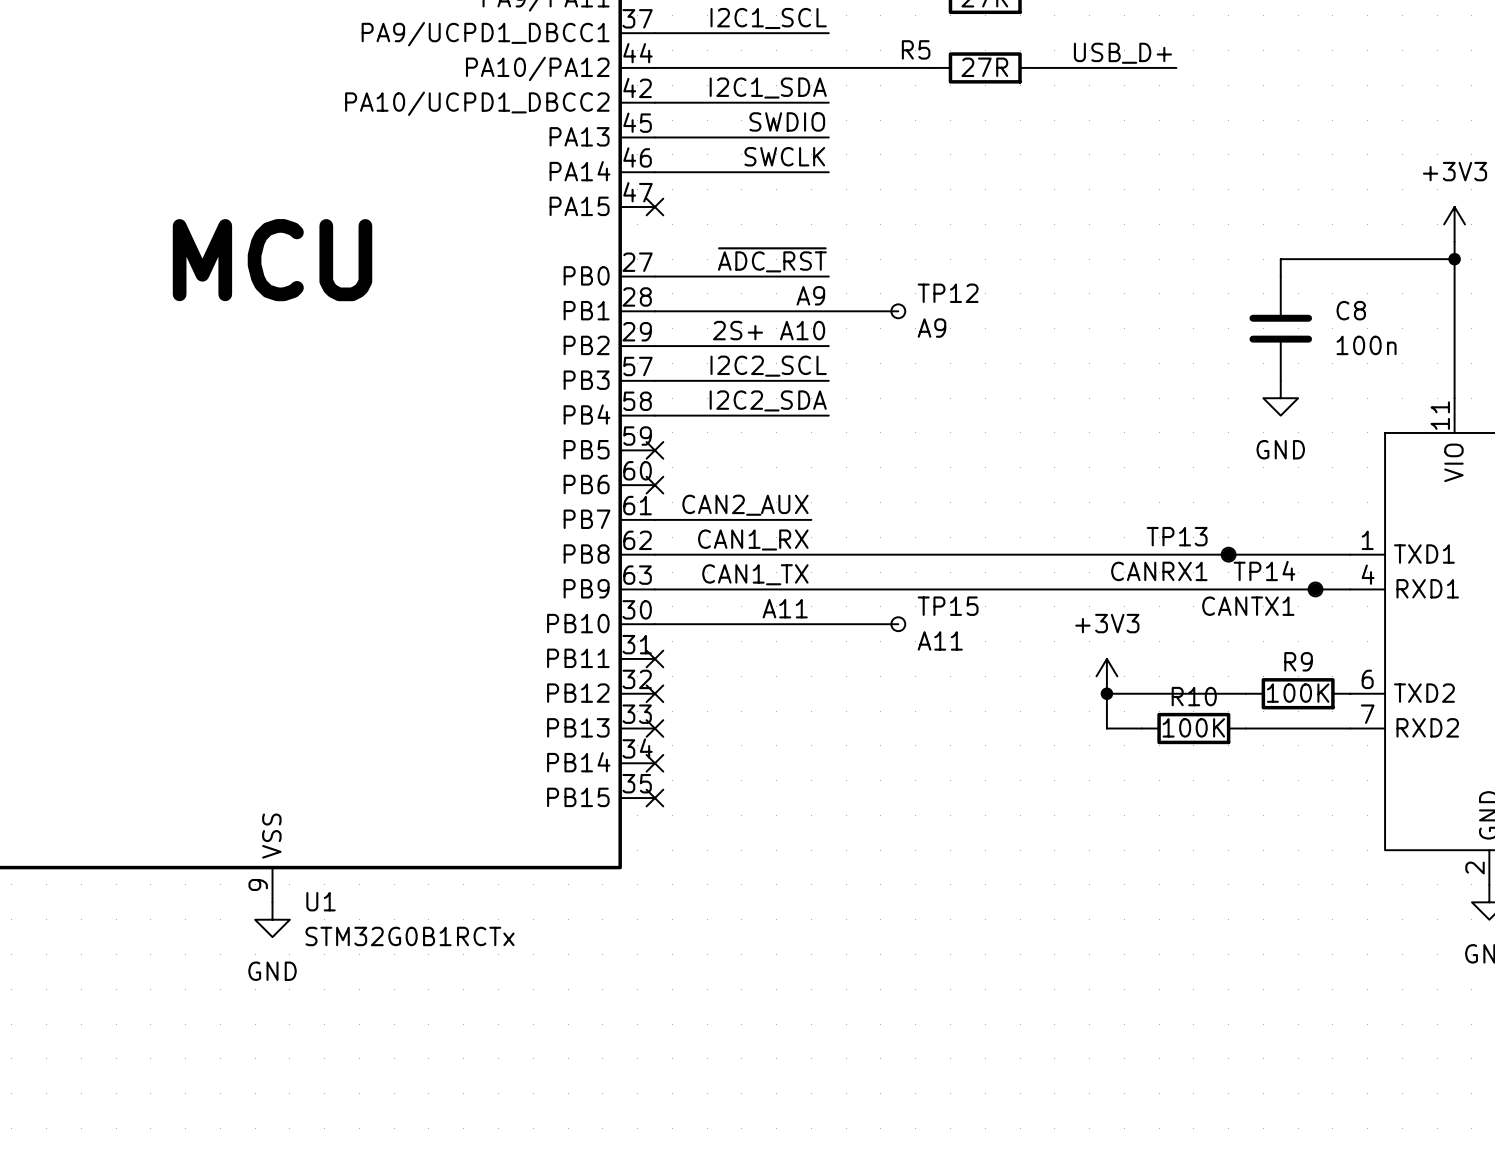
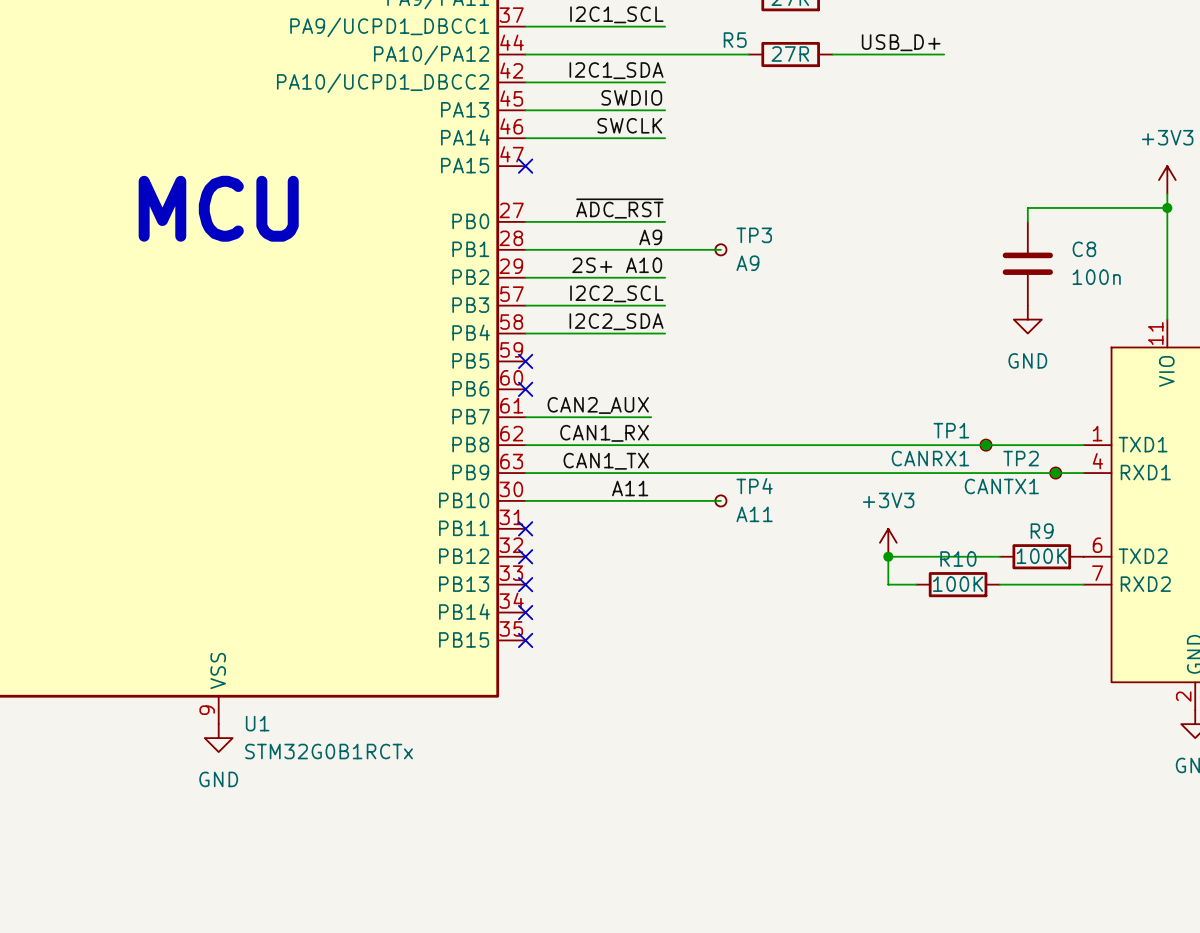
TP12 name: TP12 (948, 293) -> TP3 (754, 235)
TP13 name: TP13 (1177, 536) -> TP1 (951, 430)
TP14 name: TP14 (1264, 570) -> TP2 (1021, 458)
TP15 name: TP15 (948, 606) -> TP4 (754, 486)

